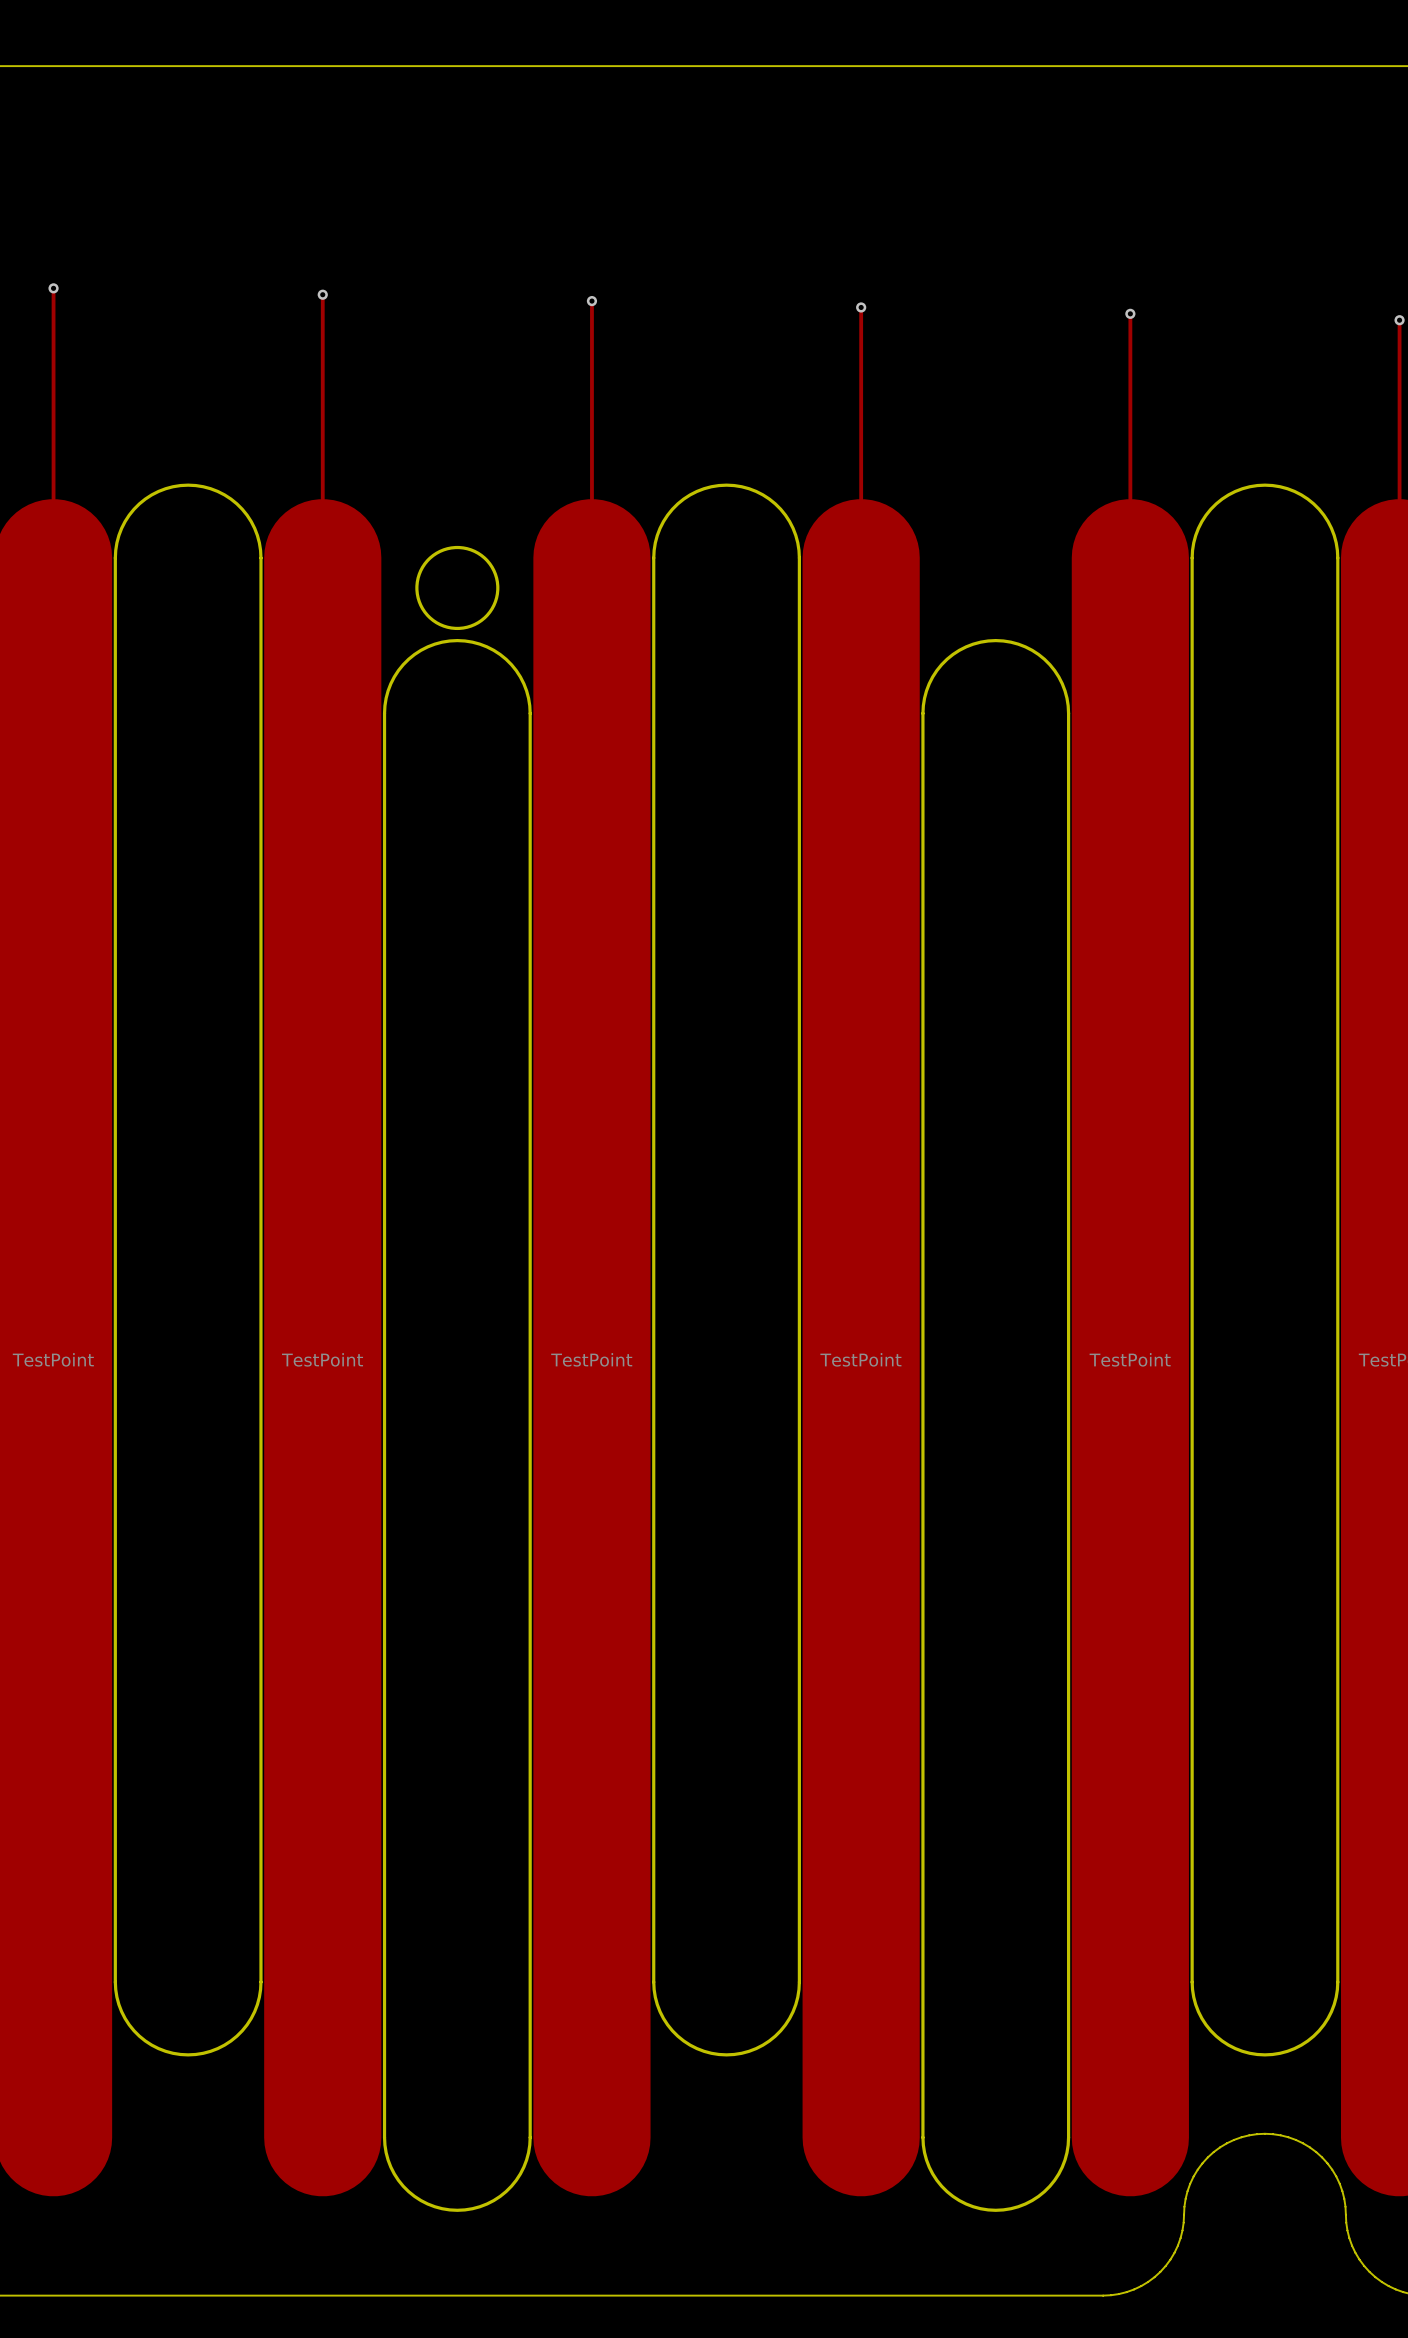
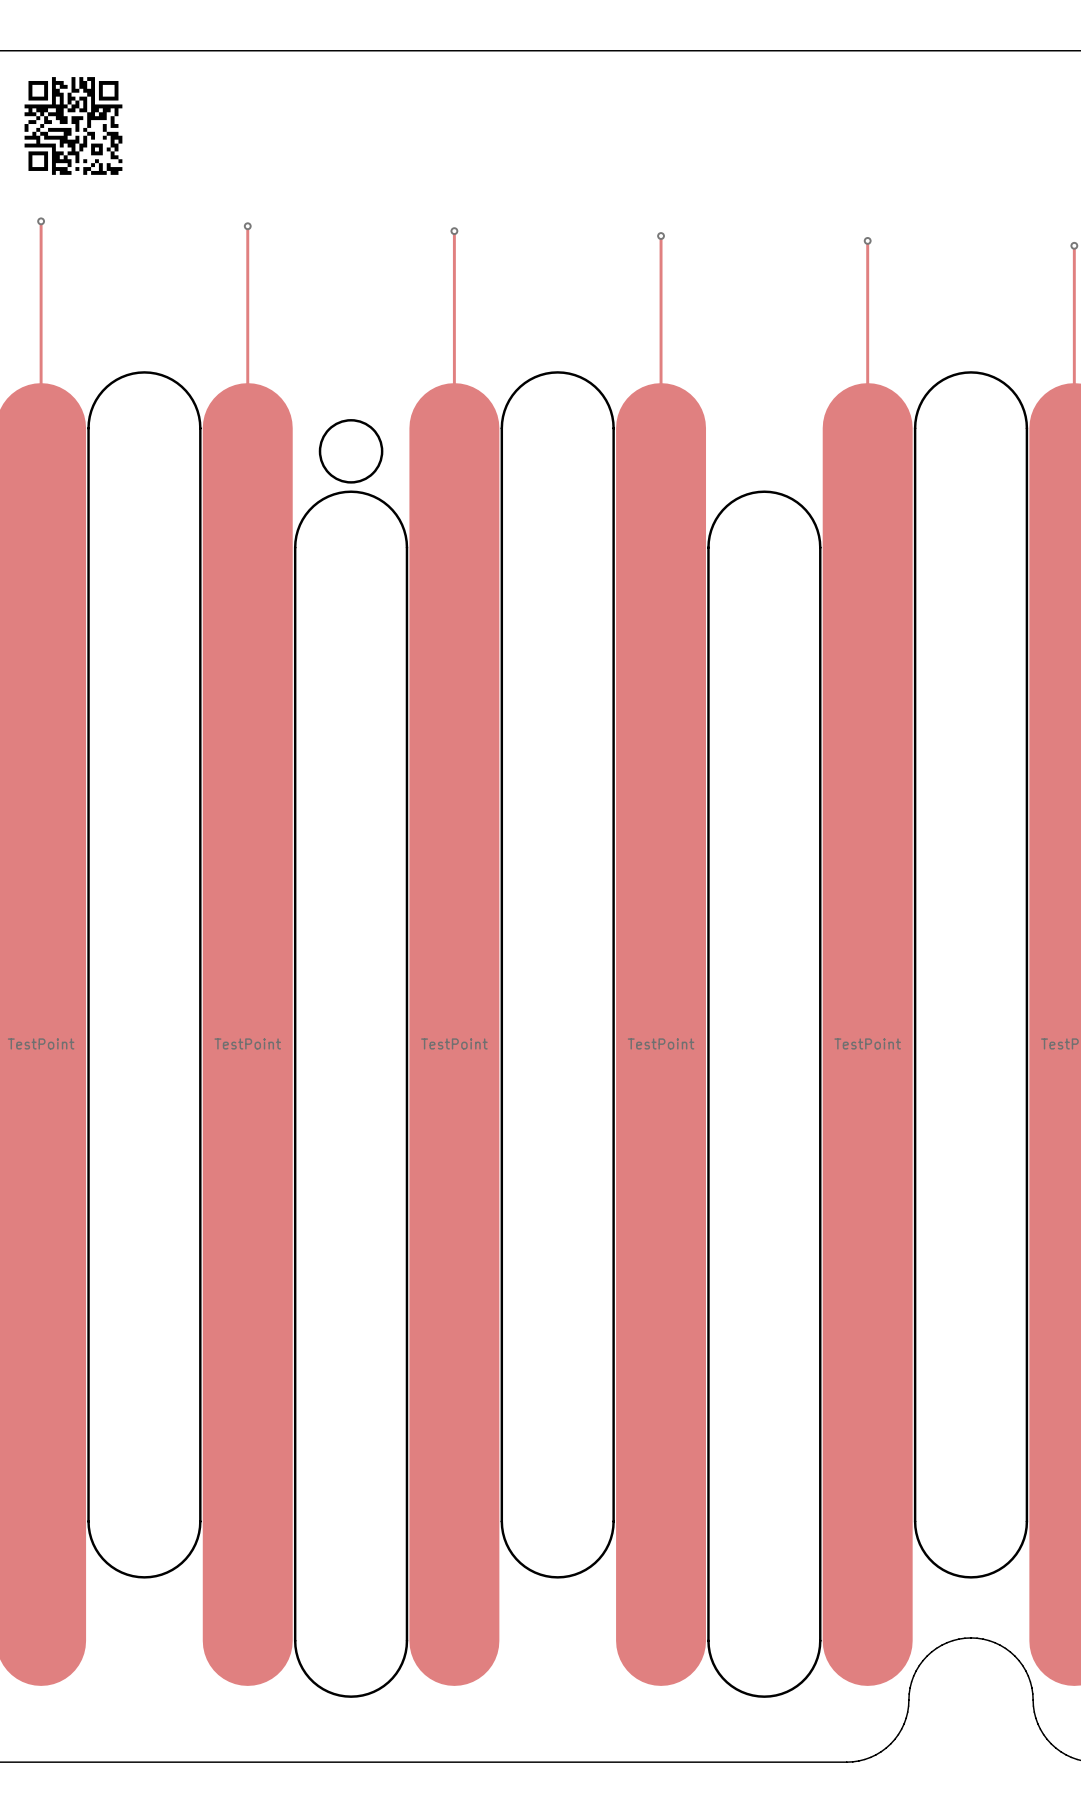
drawing: none -> [24, 77, 123, 175]

